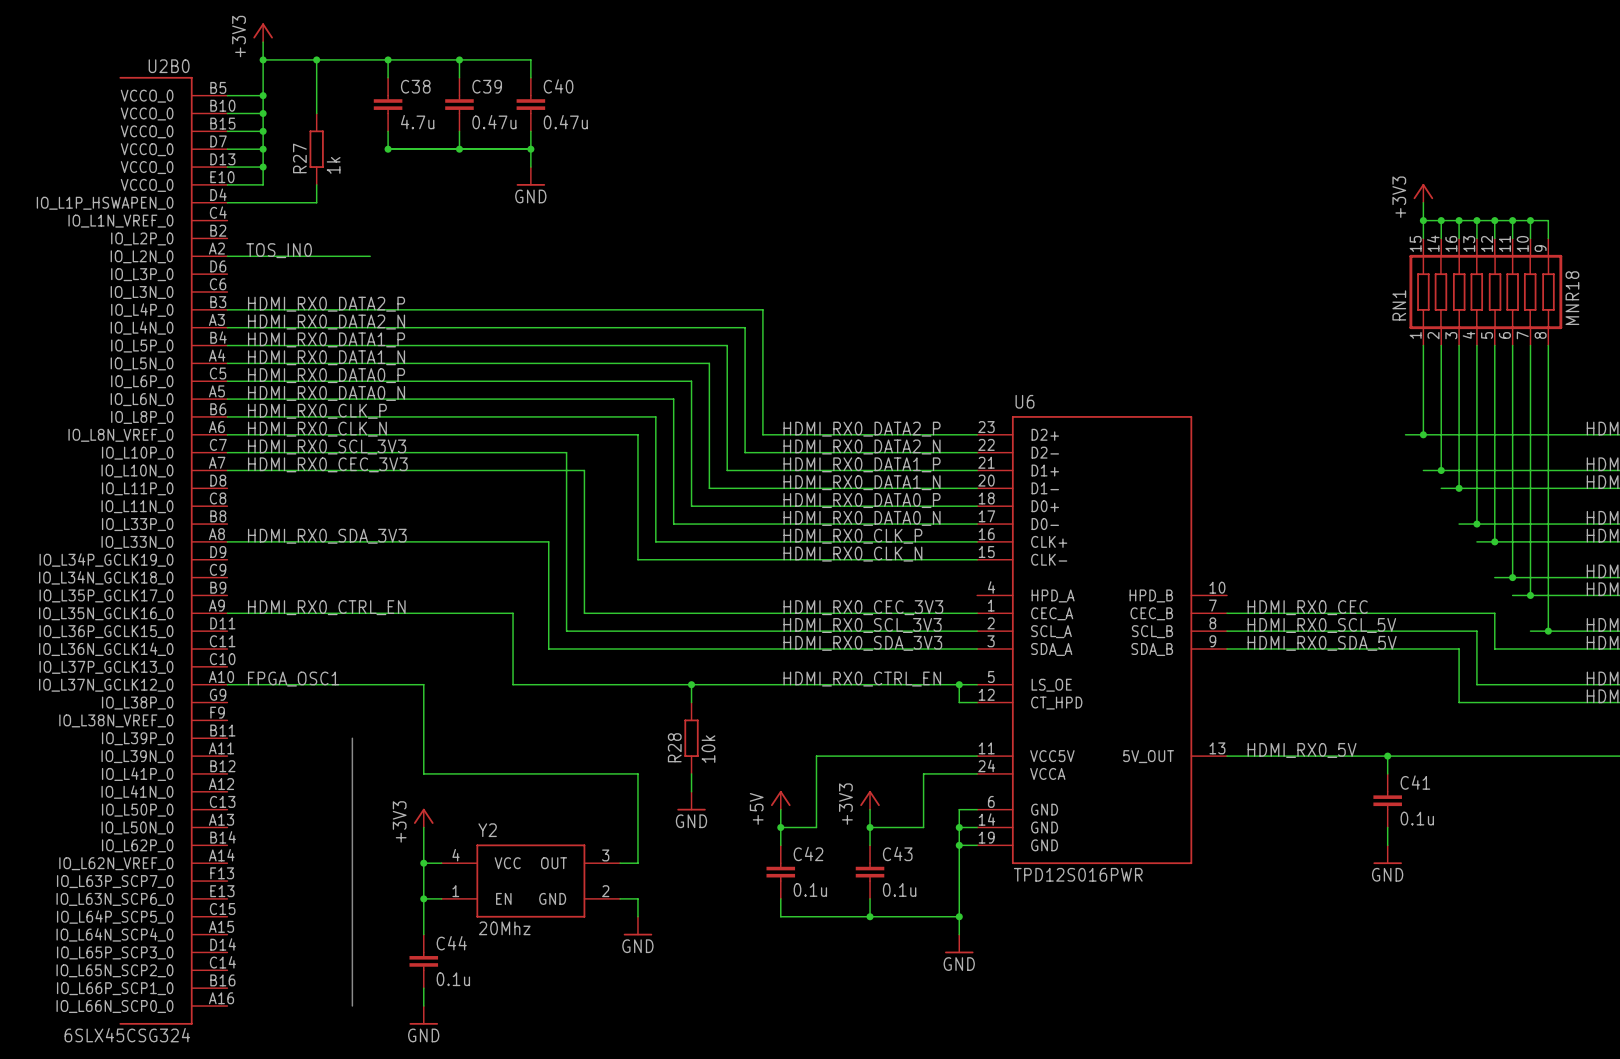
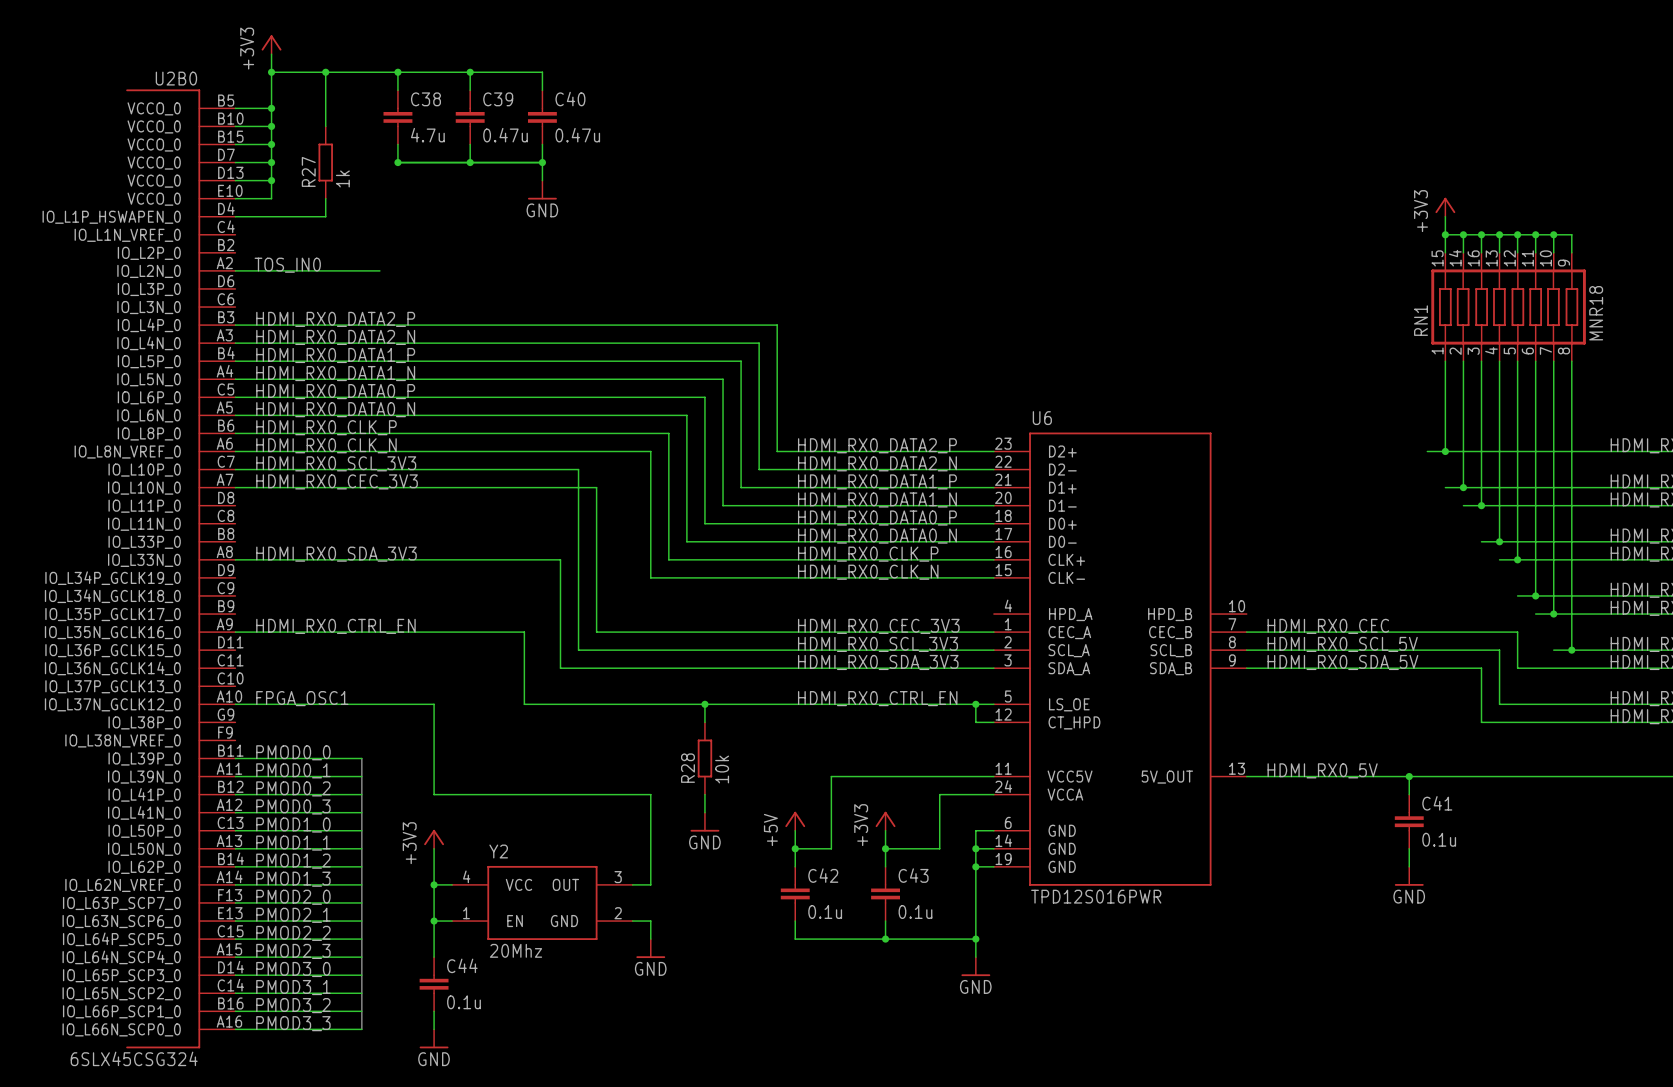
label: none -> PMOD0_0 (293, 752)
wire: none -> (235, 758) (361, 758)
label: none -> PMOD0_1 (293, 770)
wire: none -> (235, 776) (361, 776)
label: none -> PMOD0_2 (293, 788)
wire: none -> (235, 794) (361, 794)
label: none -> PMOD0_3 (293, 806)
wire: none -> (235, 812) (361, 812)
label: none -> PMOD1_0 (293, 825)
wire: none -> (235, 830) (361, 830)
label: none -> PMOD1_1 (293, 843)
wire: none -> (235, 848) (361, 848)
label: none -> PMOD1_2 (293, 861)
wire: none -> (235, 866) (361, 866)
label: none -> PMOD1_3 (293, 879)
wire: none -> (235, 884) (361, 884)
label: none -> PMOD2_0 (293, 897)
wire: none -> (235, 902) (361, 902)
label: none -> PMOD2_1 (293, 915)
wire: none -> (235, 921) (361, 921)
label: none -> PMOD2_2 (293, 933)
wire: none -> (235, 939) (361, 939)
label: none -> PMOD2_3 (293, 951)
wire: none -> (235, 957) (361, 957)
label: none -> PMOD3_0 (293, 969)
wire: none -> (235, 975) (361, 975)
label: none -> PMOD3_1 (293, 987)
wire: none -> (235, 993) (361, 993)
label: none -> PMOD3_2 (293, 1005)
wire: none -> (235, 1011) (361, 1011)
label: none -> PMOD3_3 (293, 1023)
wire: none -> (235, 1029) (361, 1029)

